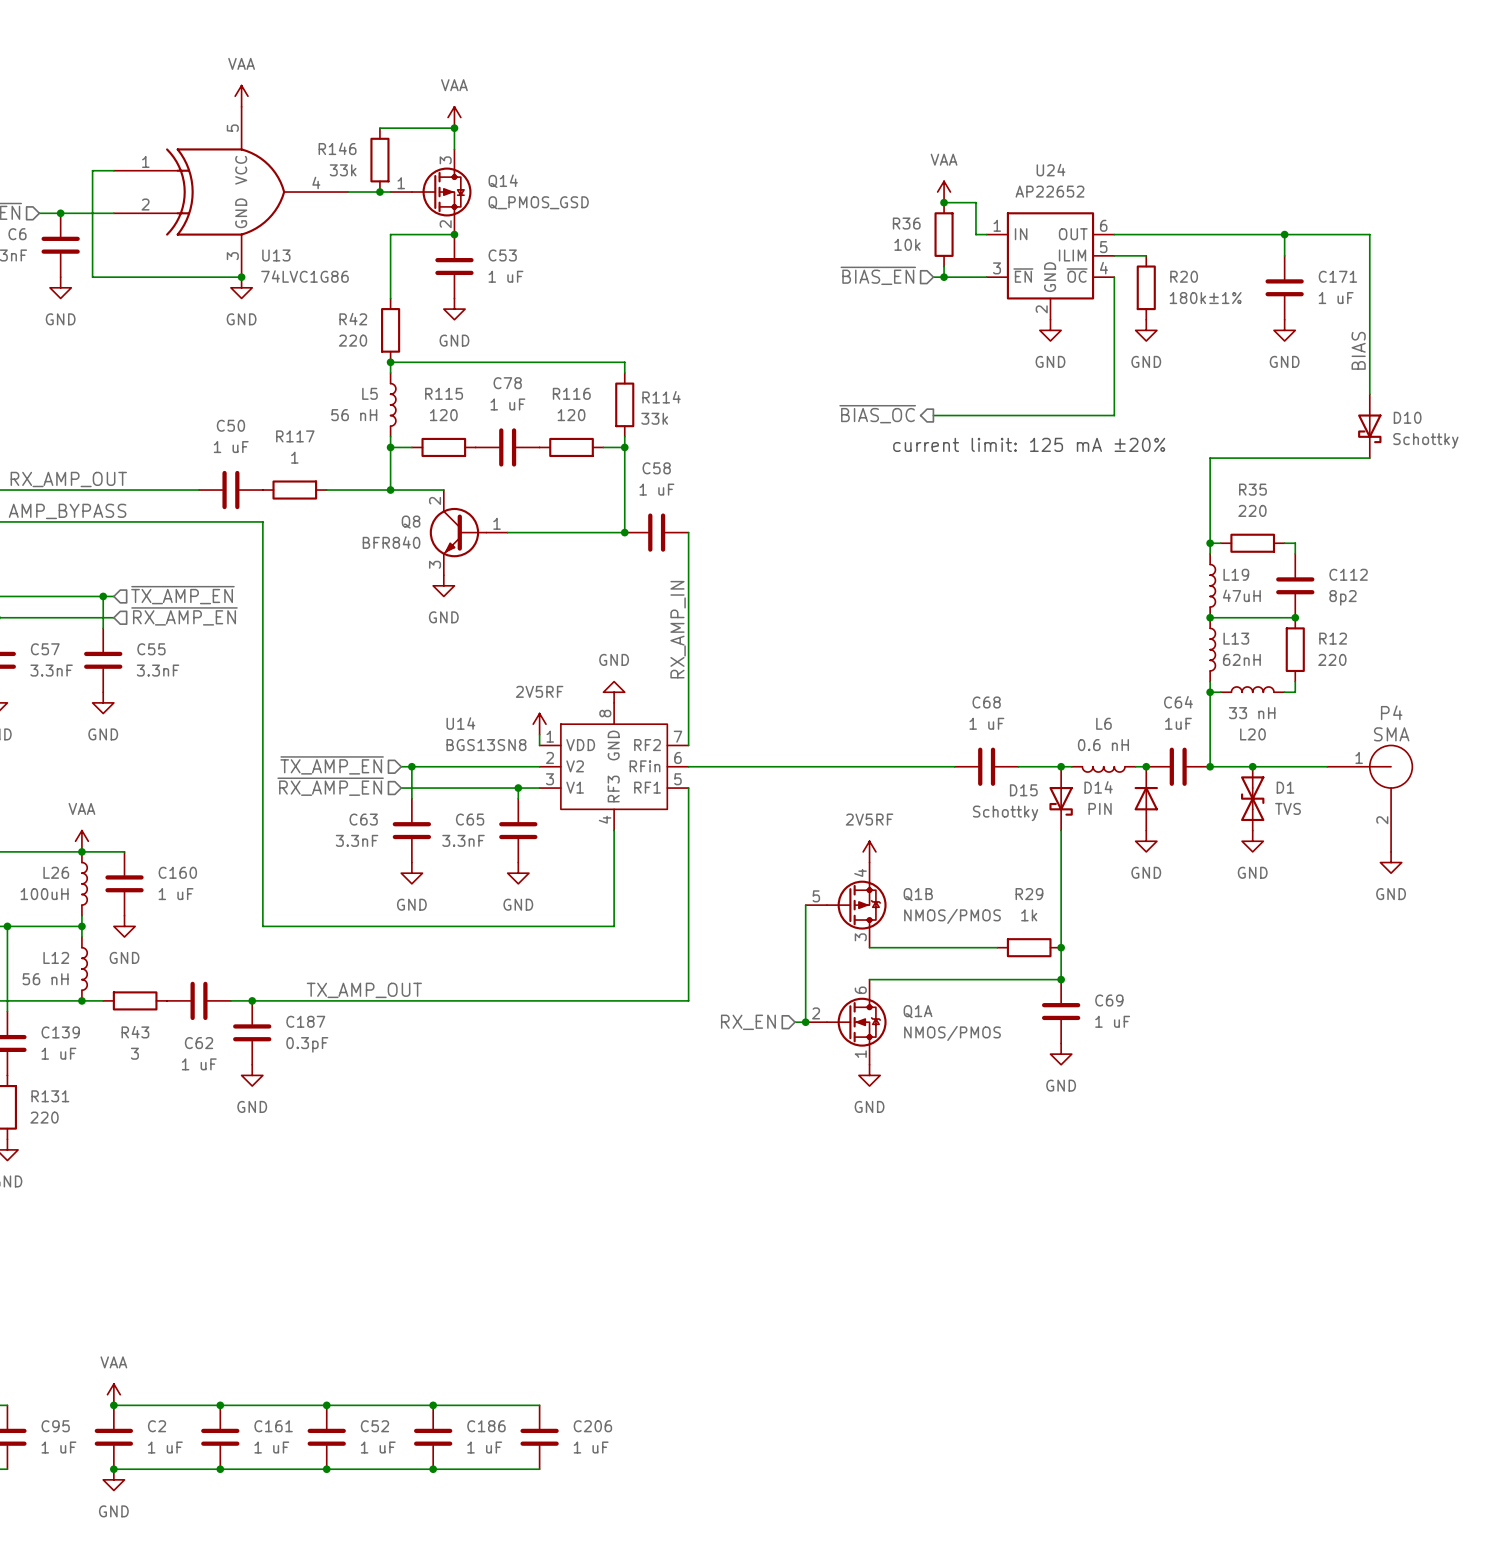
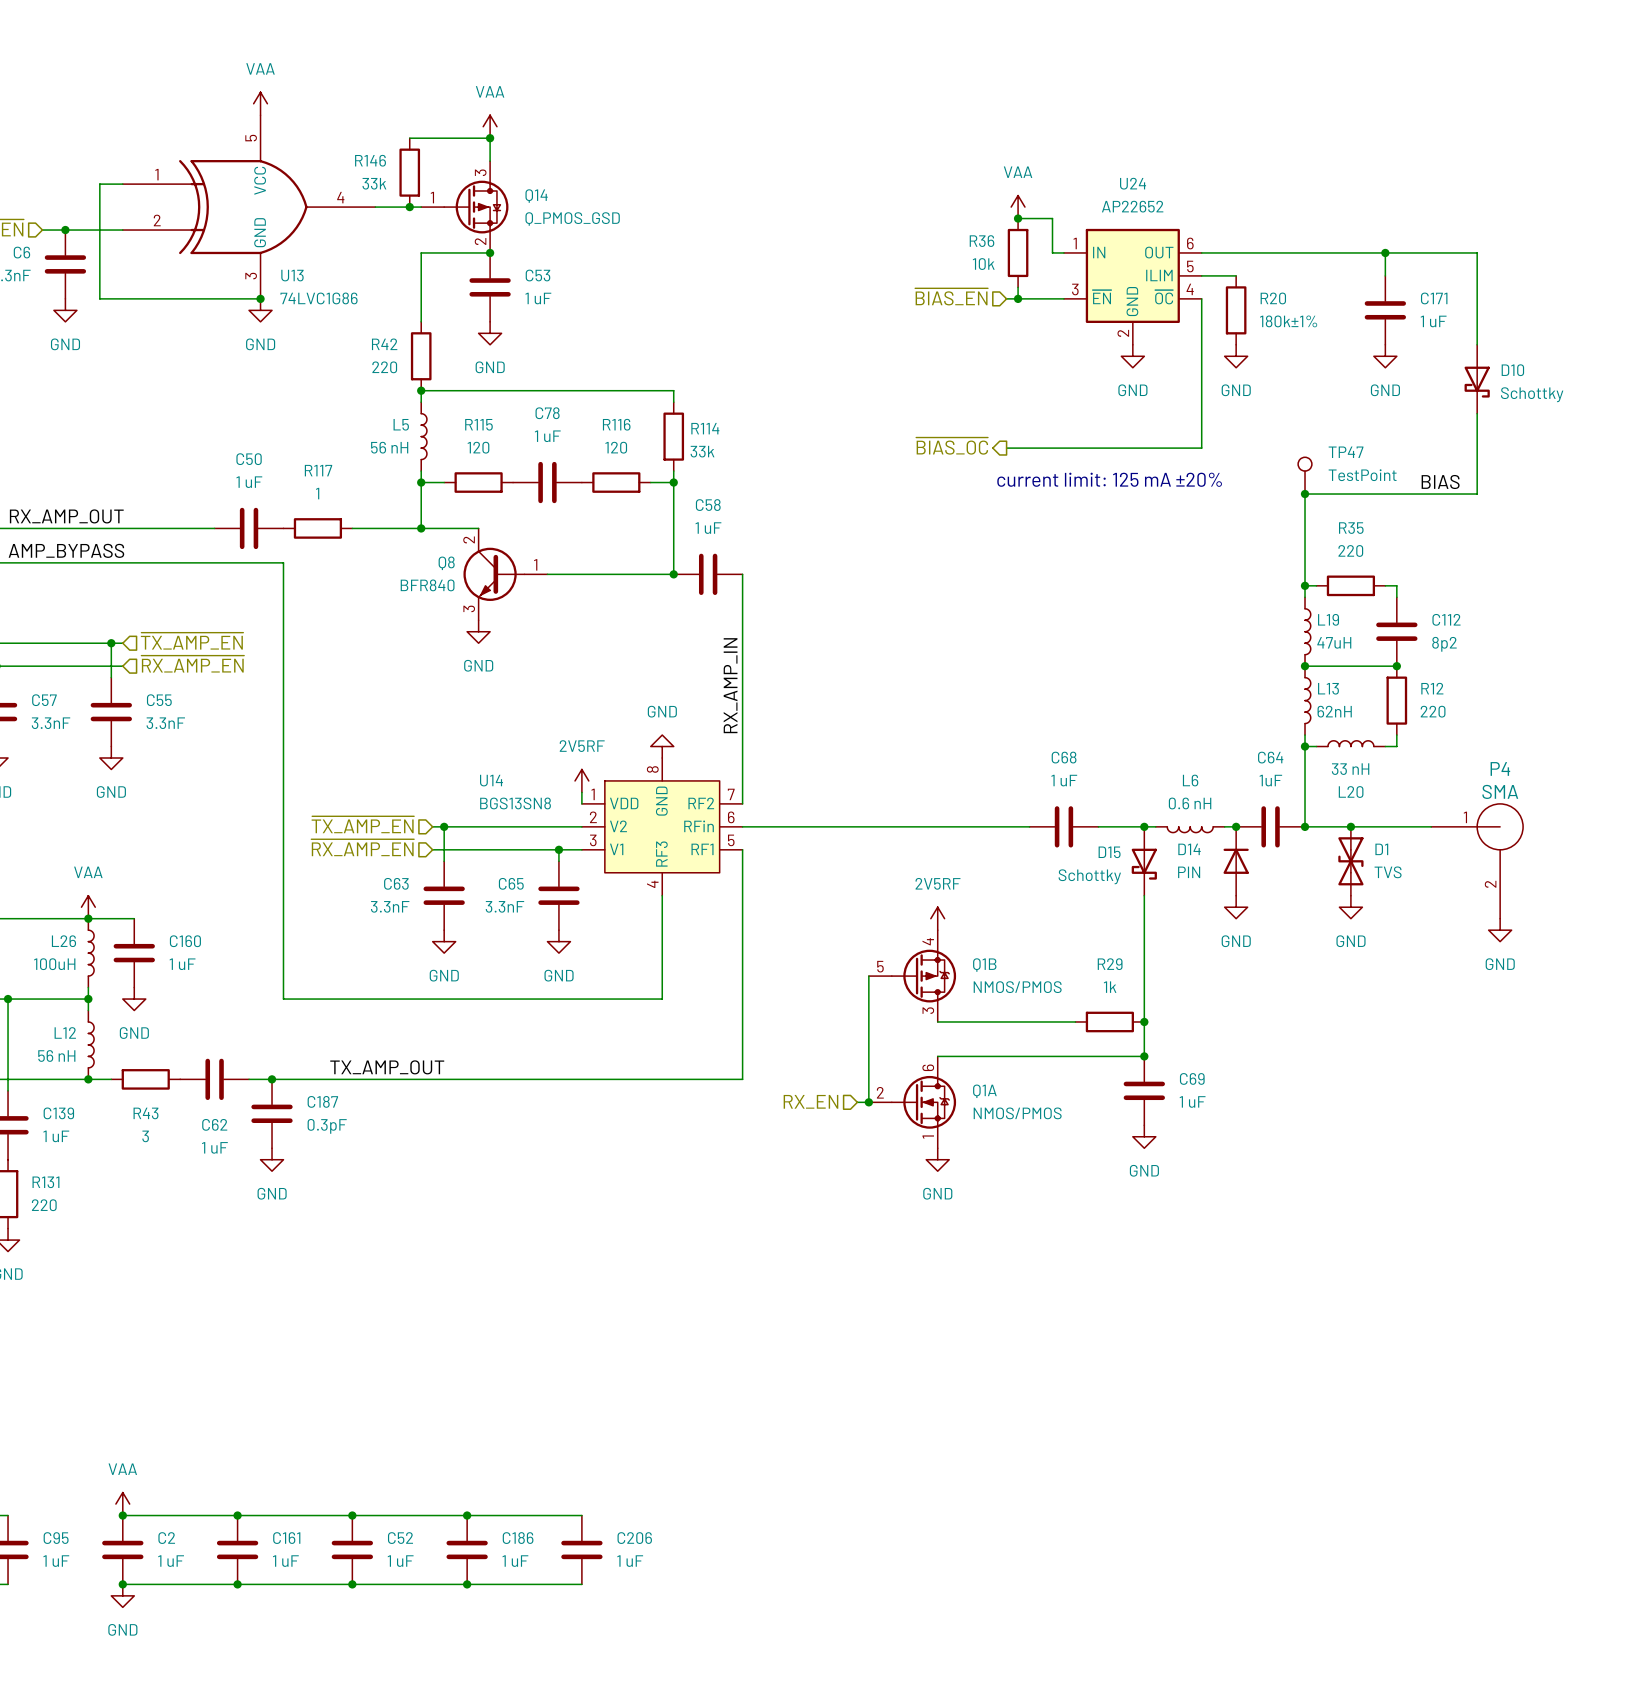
label rotation: 0° (1358, 350) -> 90° clockwise (1440, 481)
label position: BIAS (1358, 350) -> BIAS (1440, 481)
D10 position: (1369, 426) -> (1477, 379)
TP47: none -> TestPoint (1305, 475)
junction: none -> (1305, 494)

